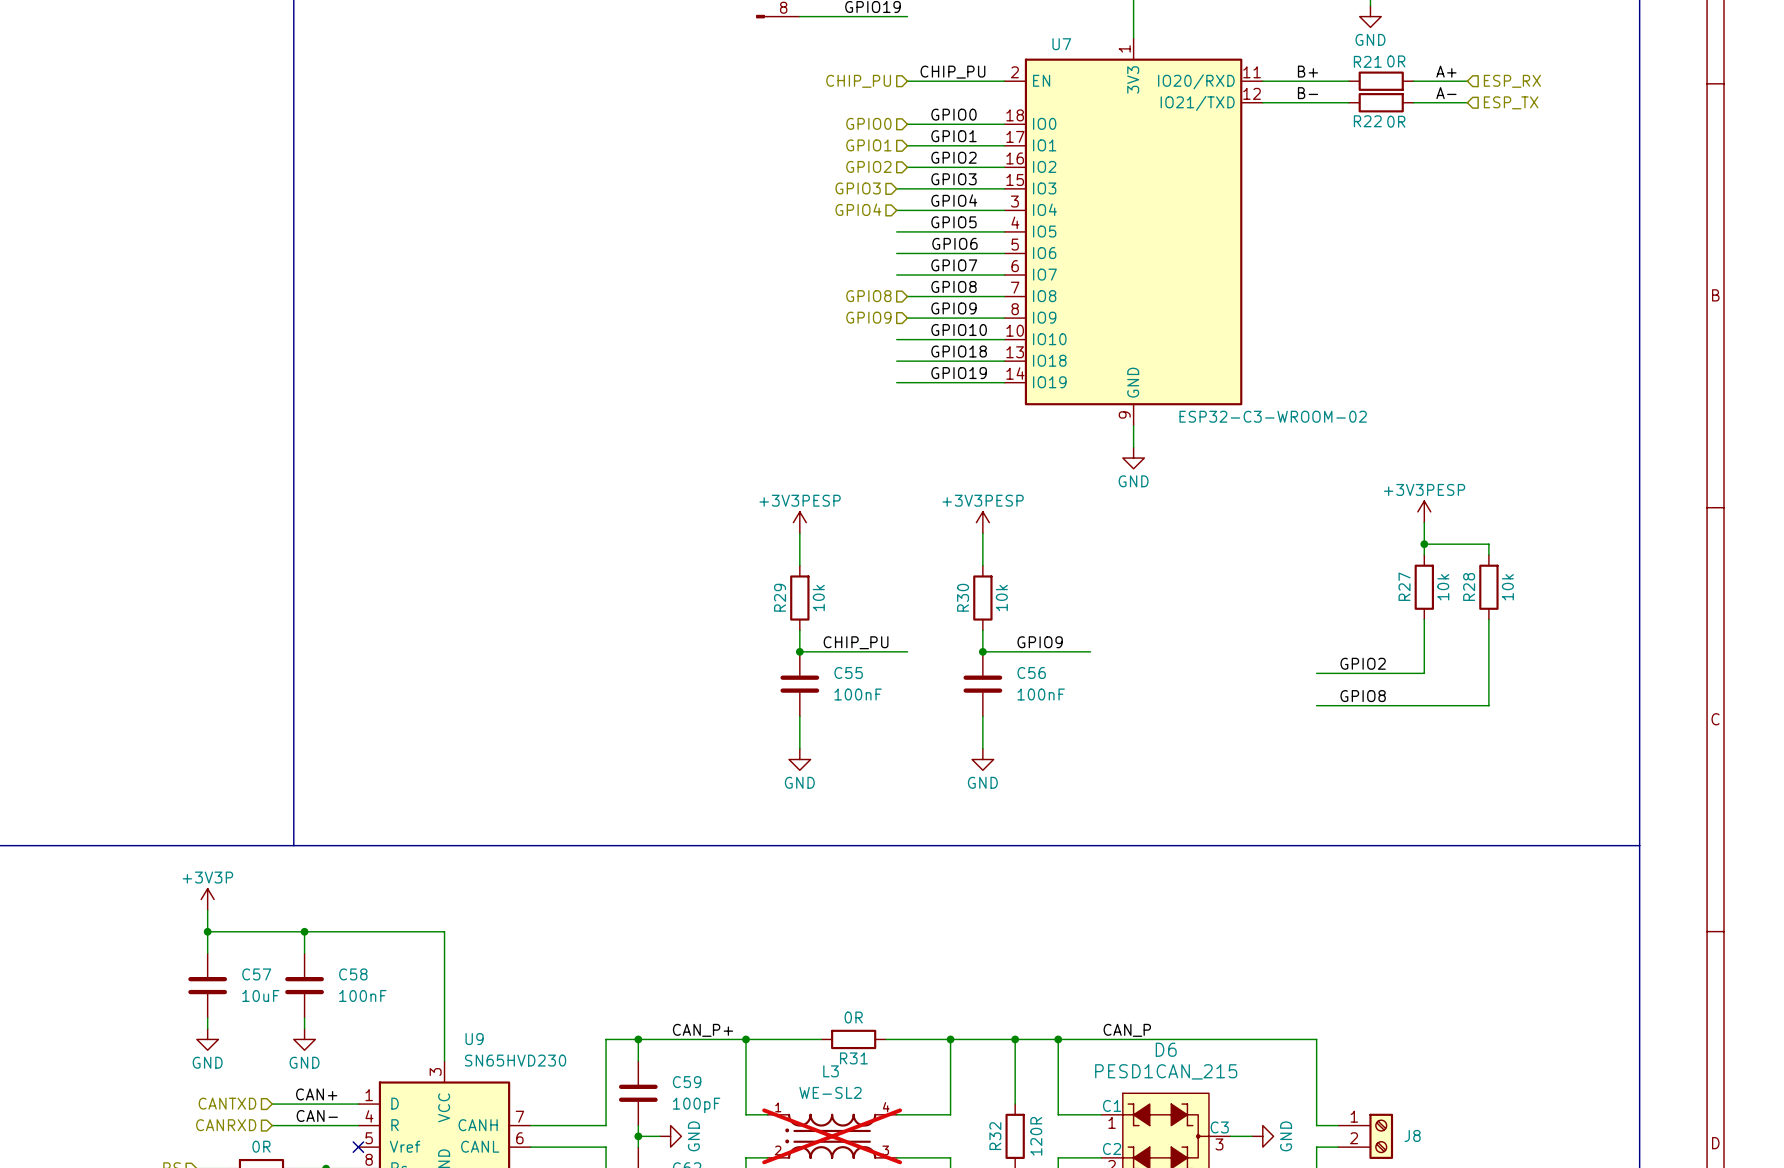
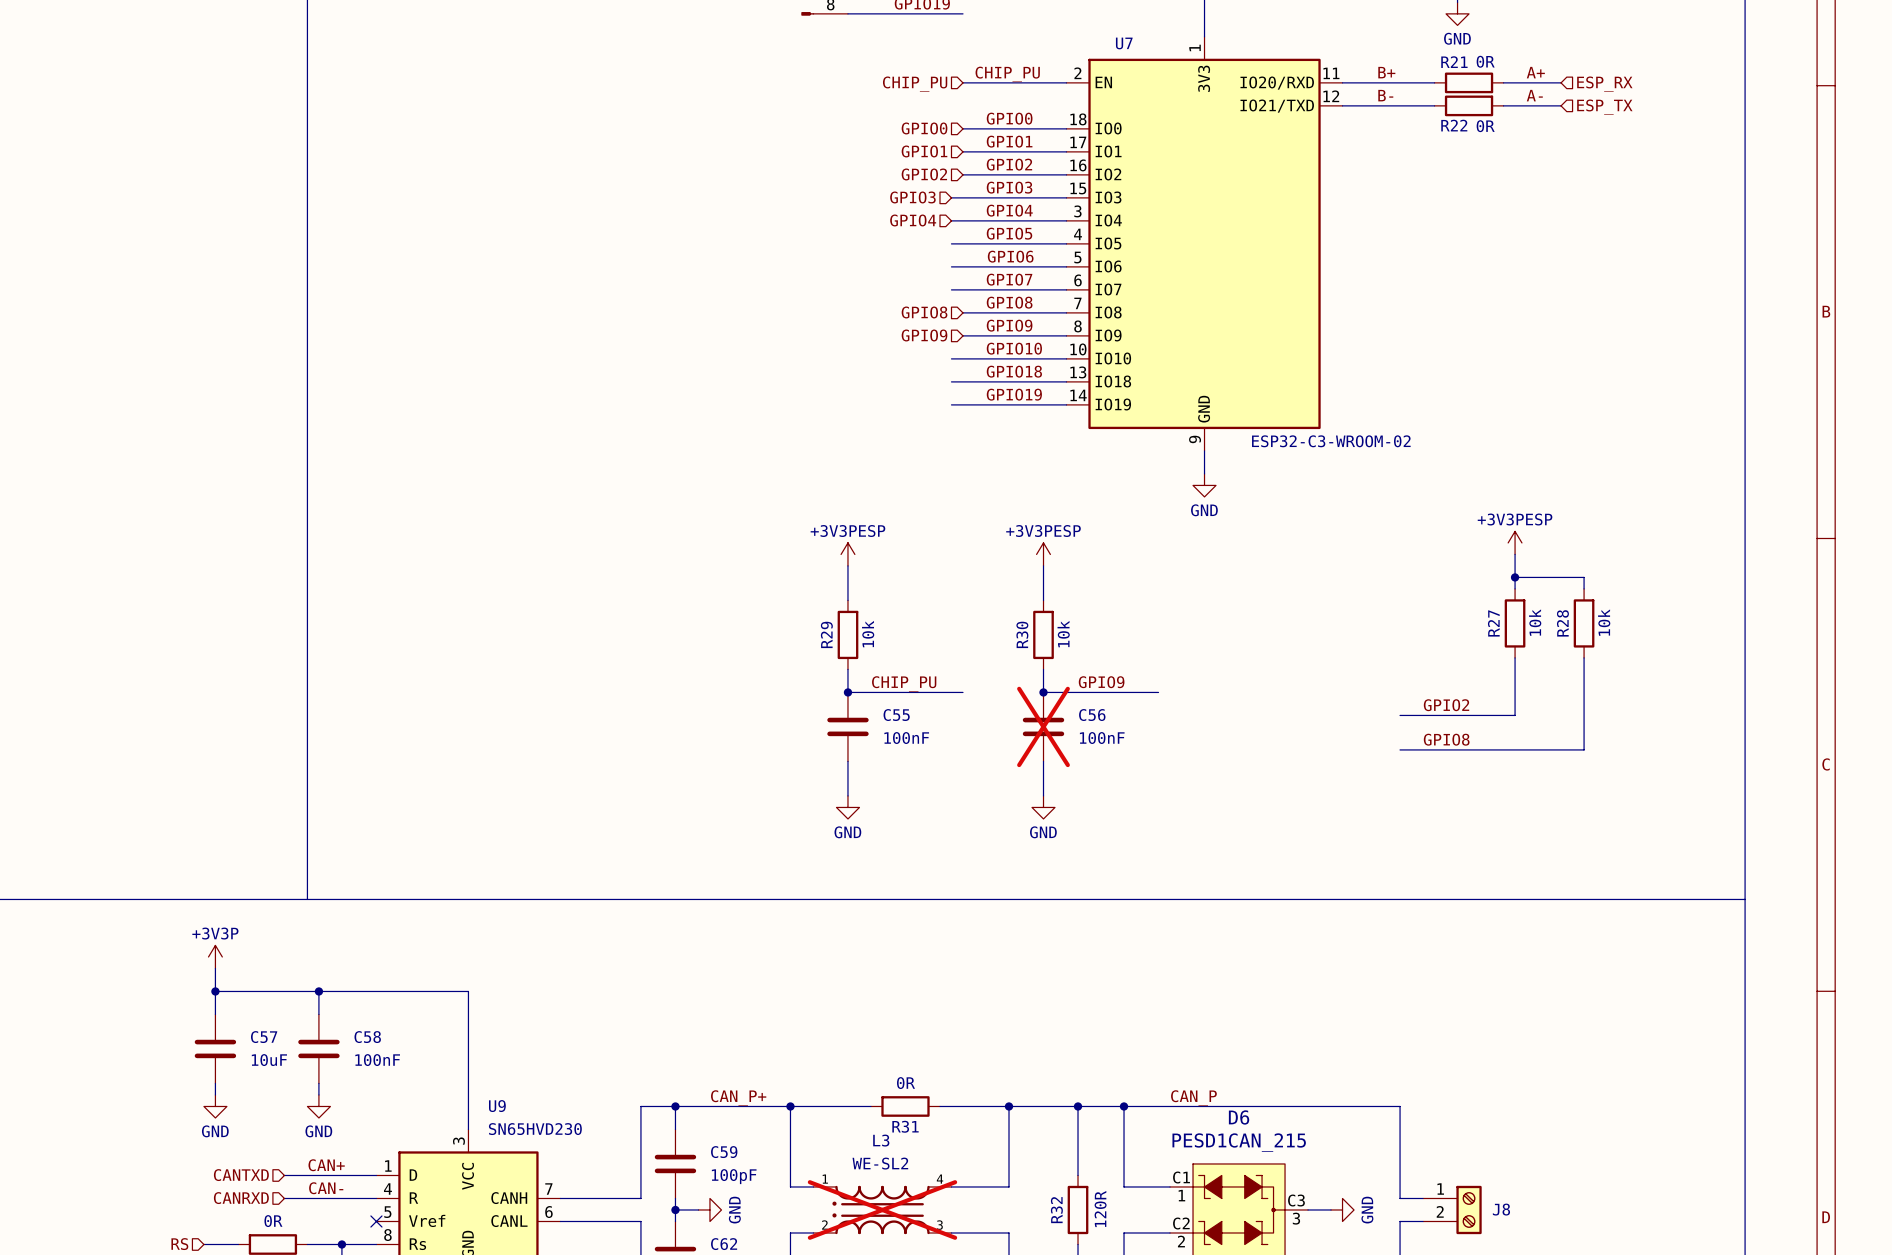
C56 do-not-place cross: none -> (1043, 726)

